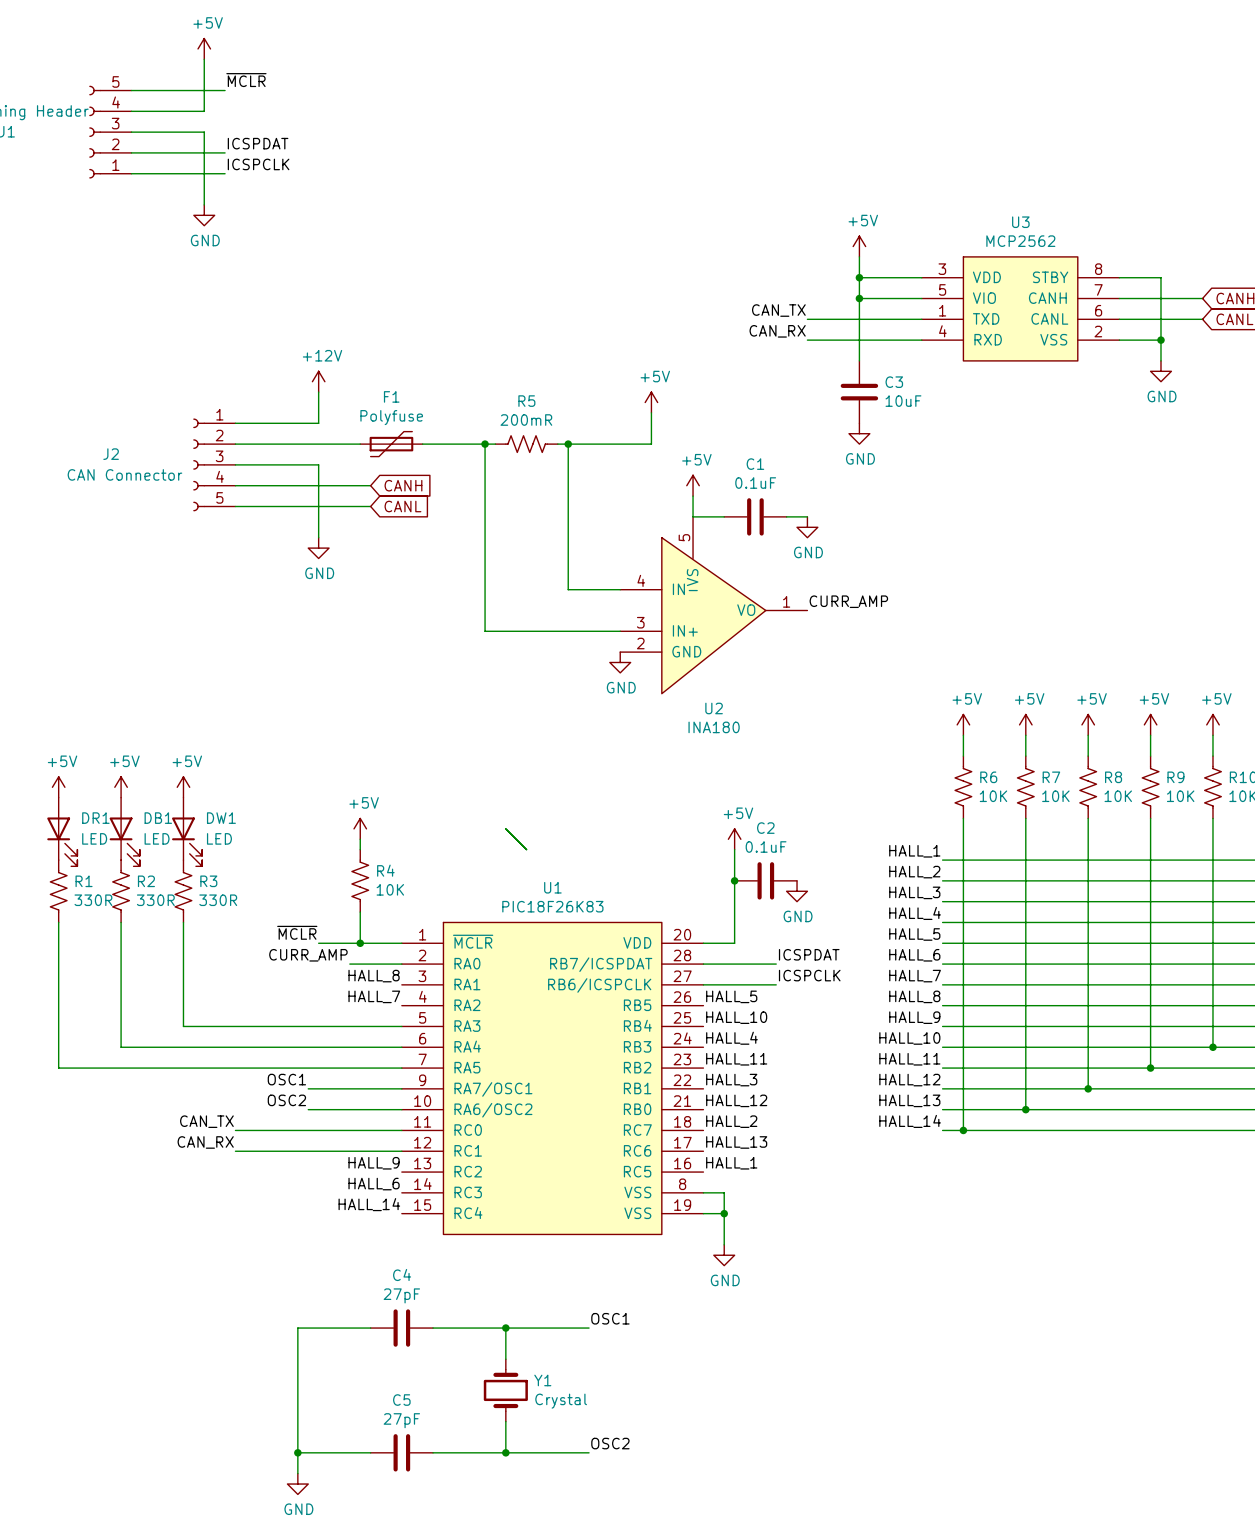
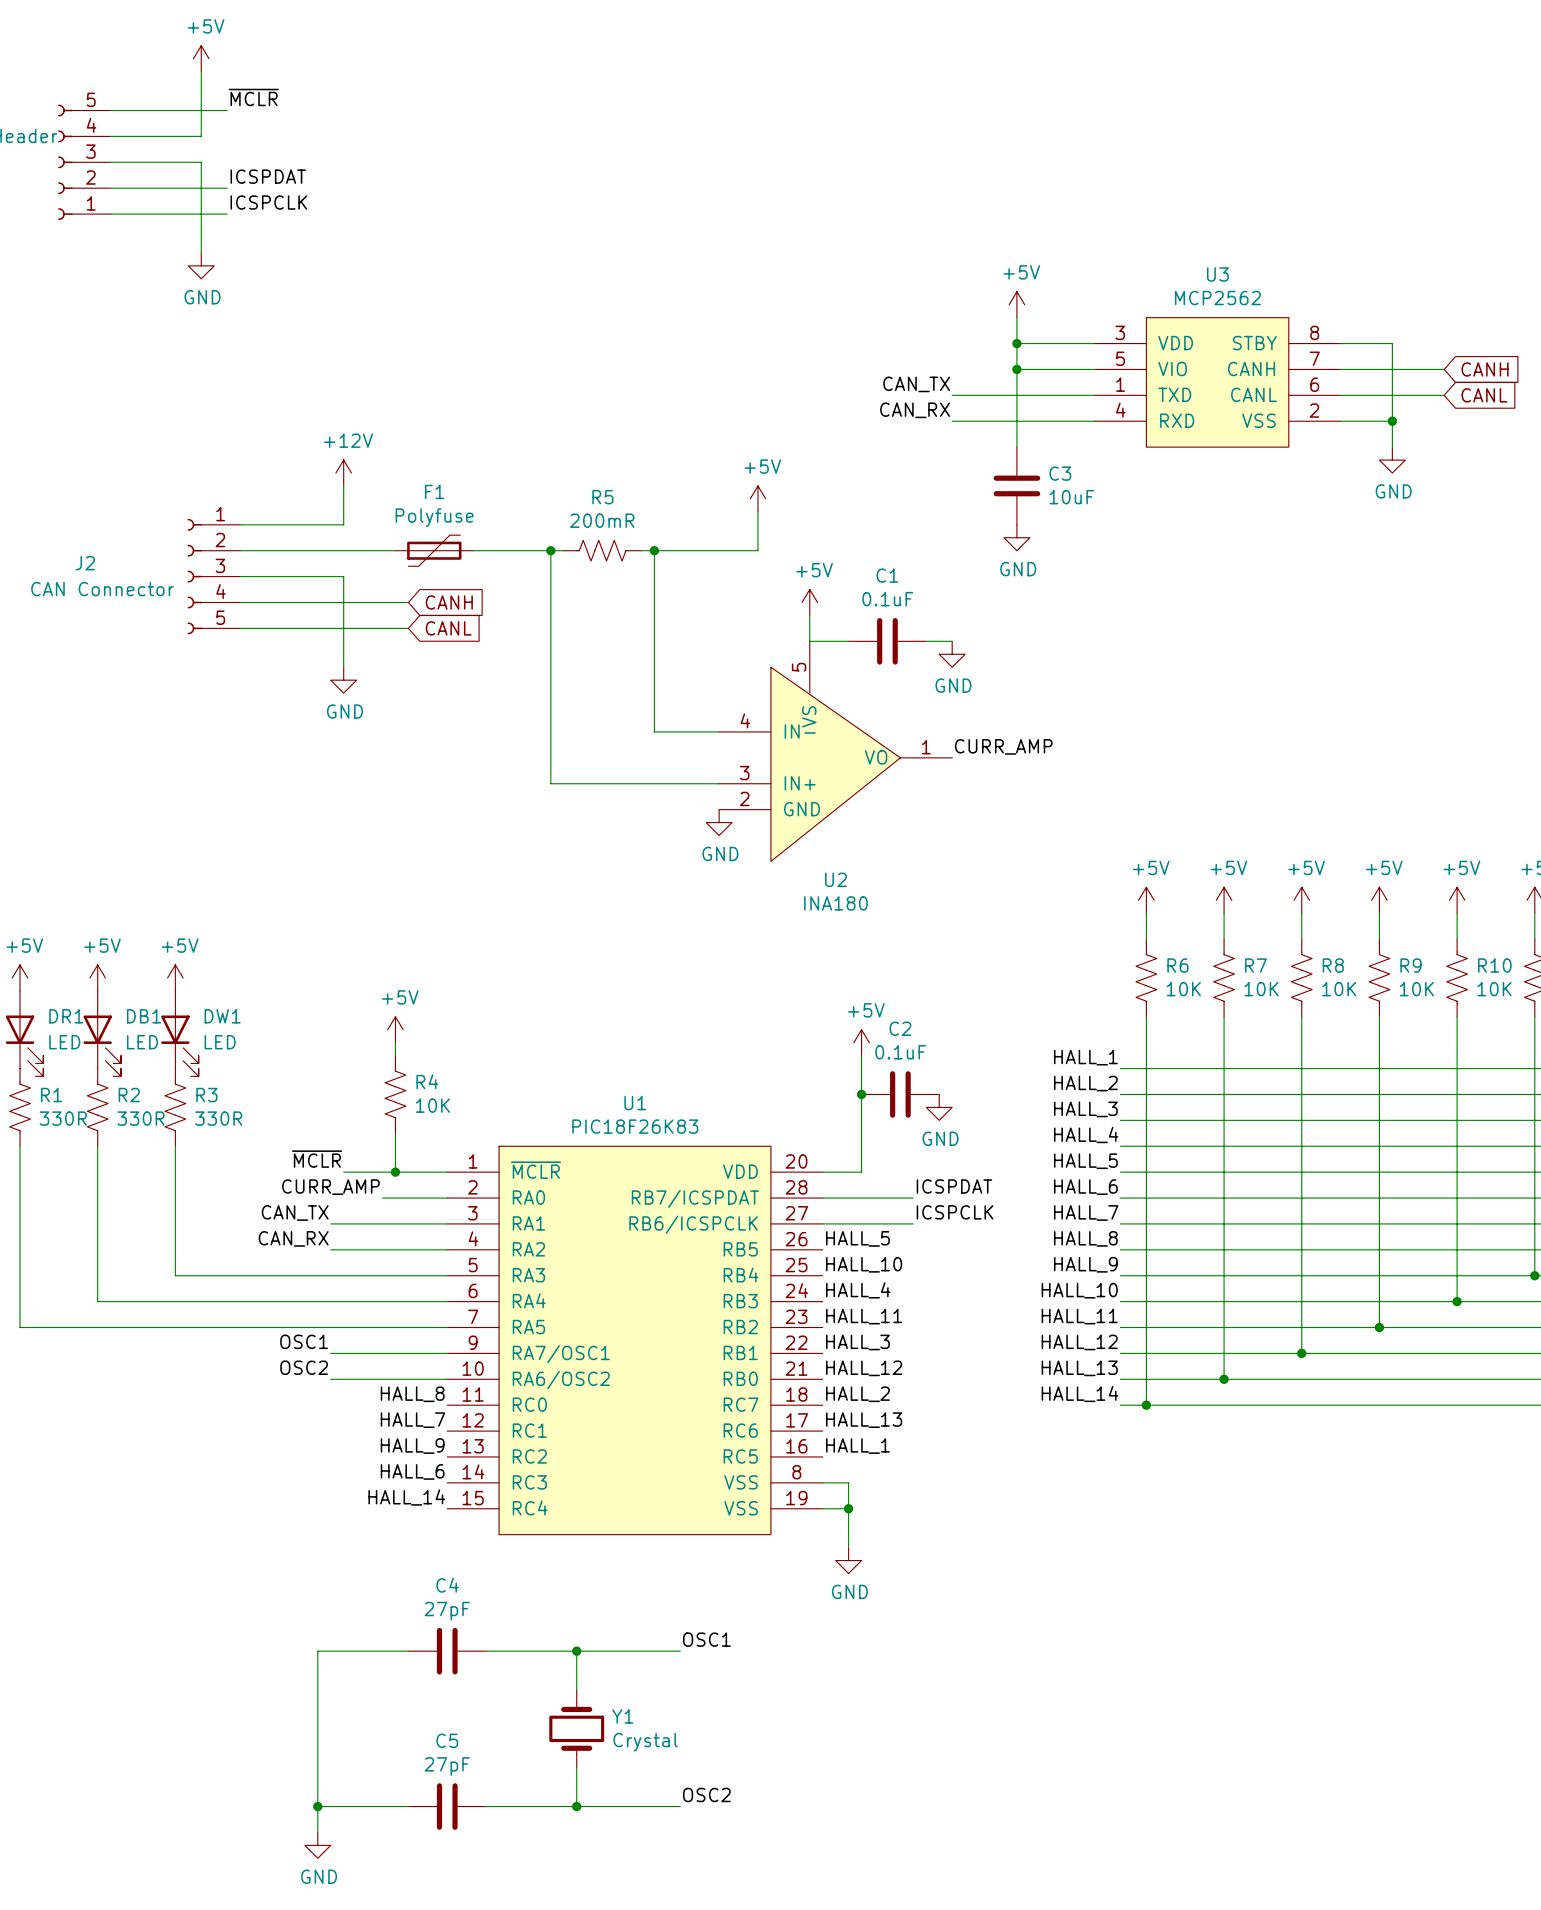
wire: (505, 828) (526, 849) -> none
label position: HALL_8 (374, 976) -> HALL_8 (412, 1394)
wire: none -> (330, 1223) (447, 1223)
label position: HALL_7 (374, 996) -> HALL_7 (412, 1420)
wire: none -> (330, 1249) (447, 1249)
label position: CAN_TX (206, 1121) -> CAN_TX (295, 1213)
wire: (235, 1130) (401, 1130) -> none
label position: CAN_RX (205, 1142) -> CAN_RX (293, 1238)
wire: (235, 1151) (401, 1151) -> none

